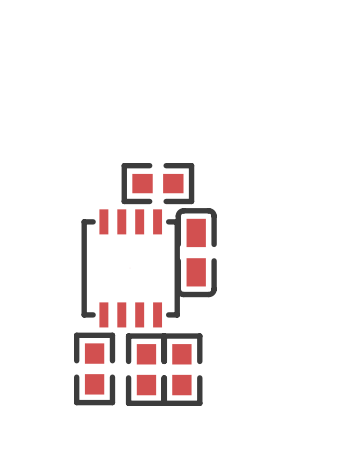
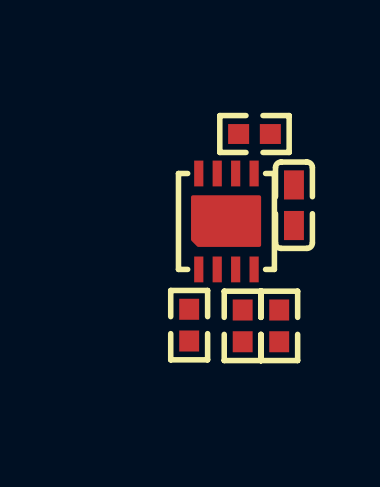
part footprint: [80, 209, 180, 331] -> [174, 160, 278, 286]

